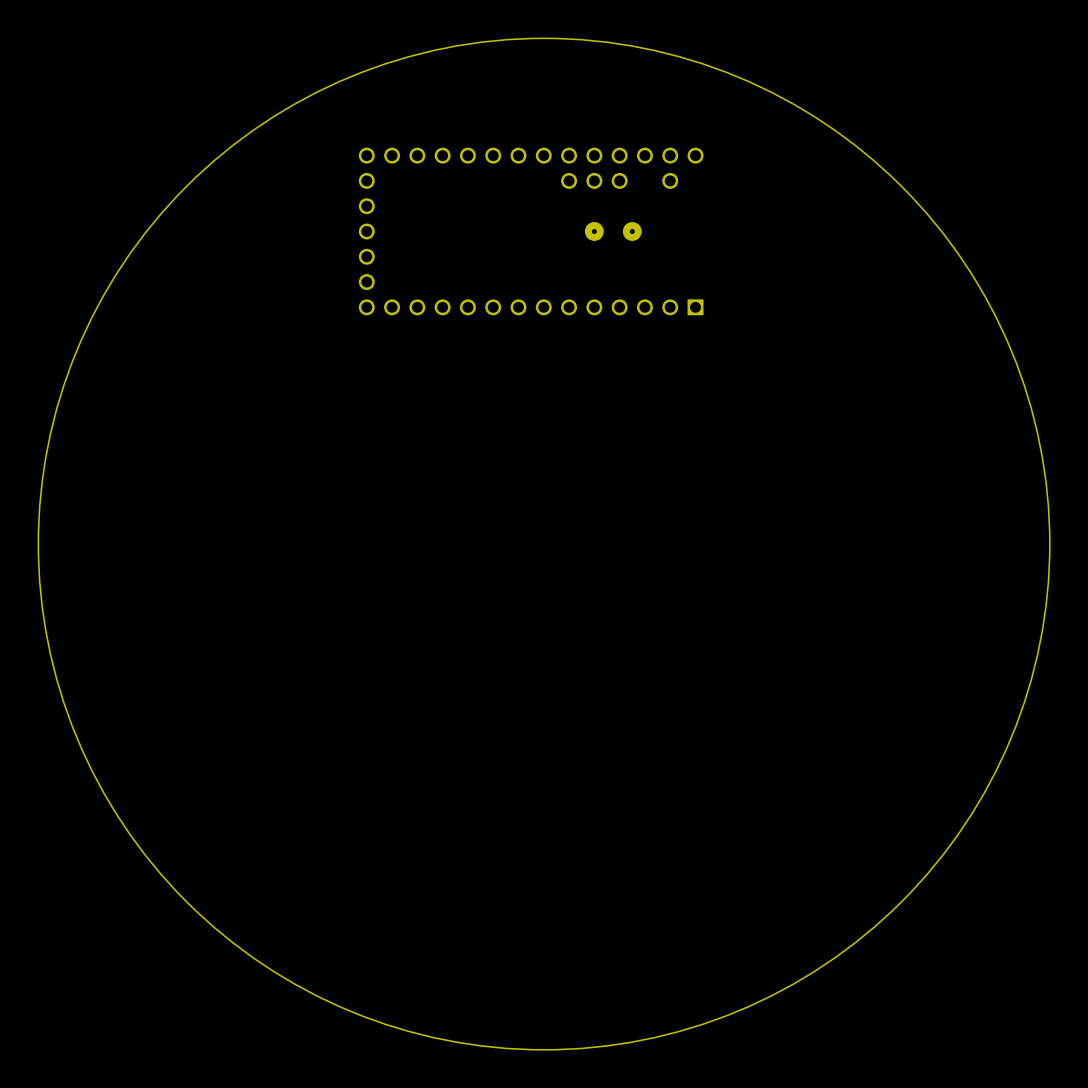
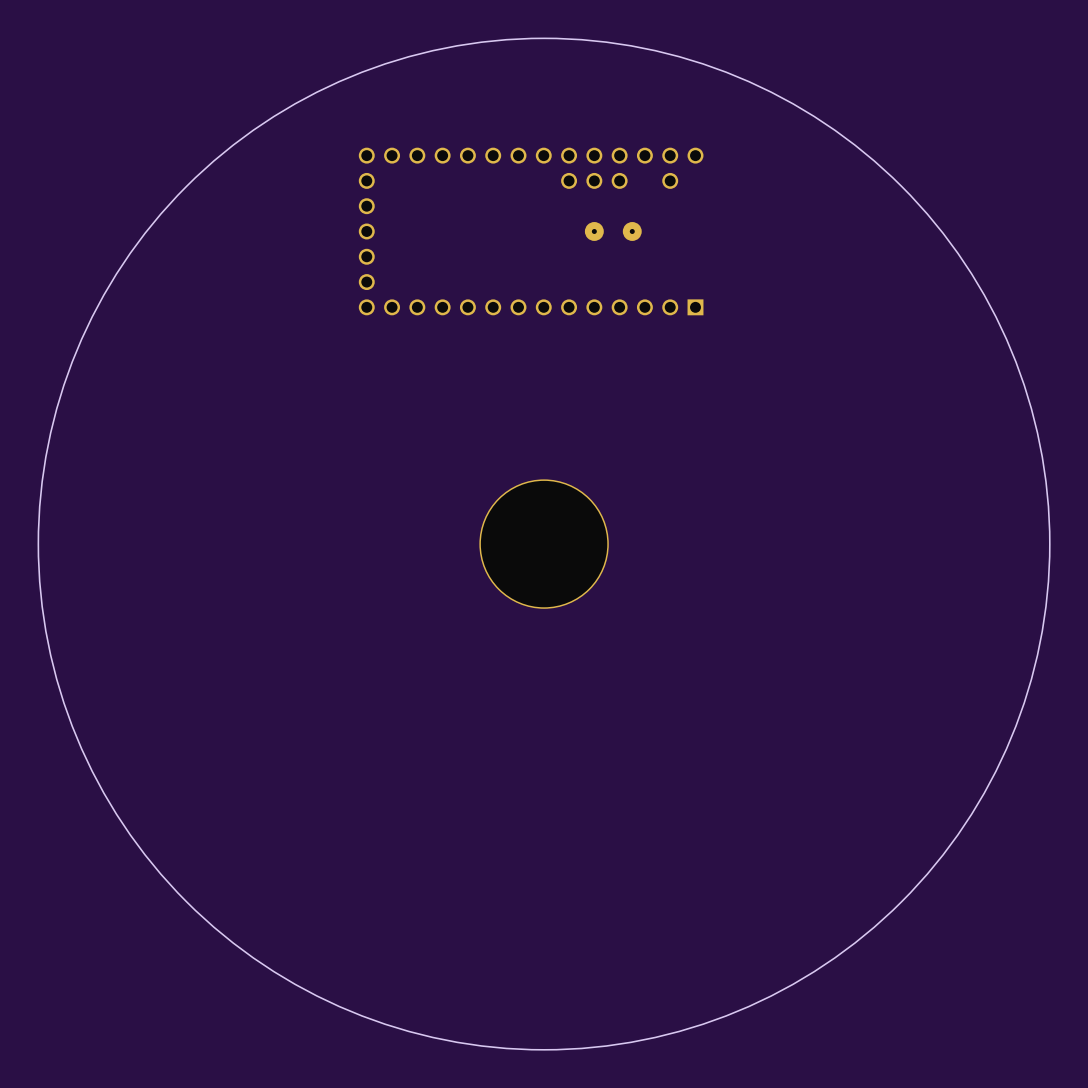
part: none -> (544, 544)

